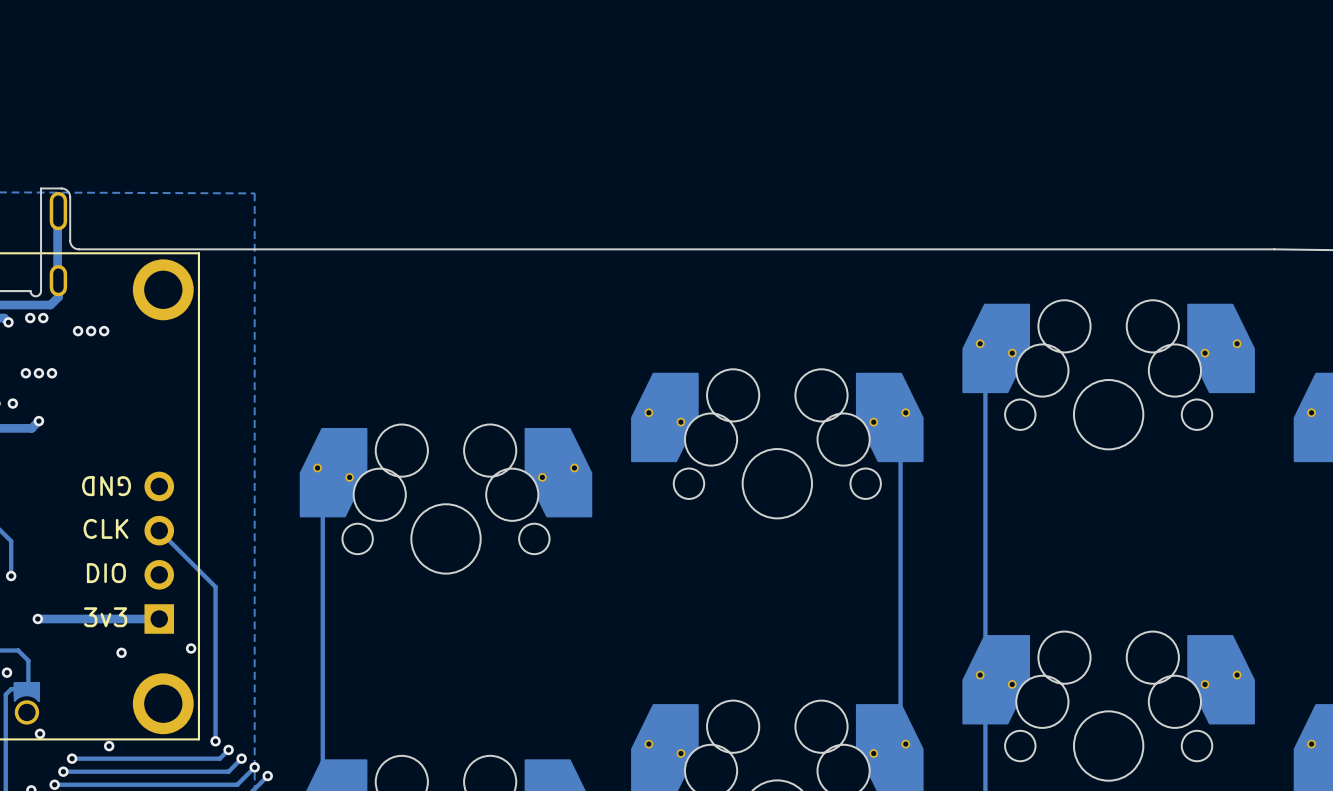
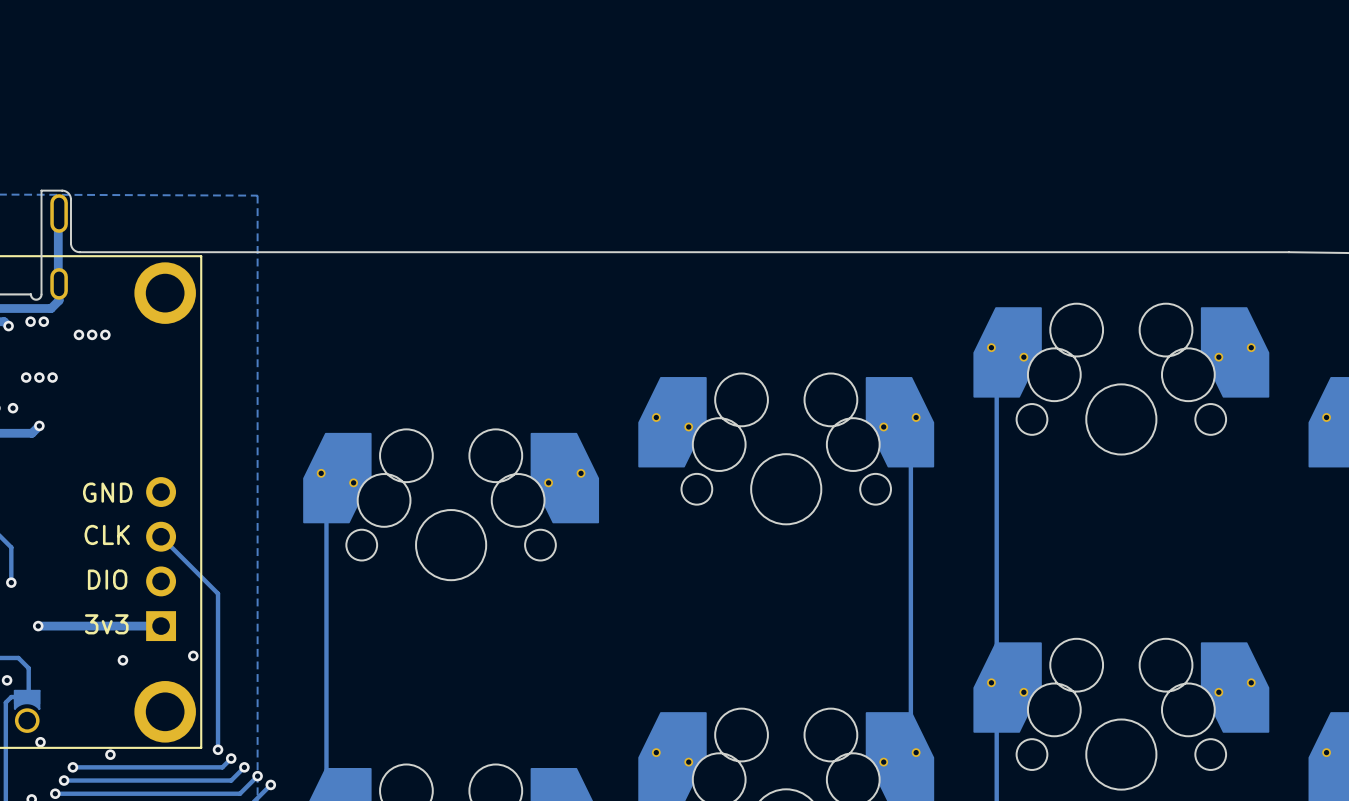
text rotation: 0° (106, 486) -> 180° (107, 492)

